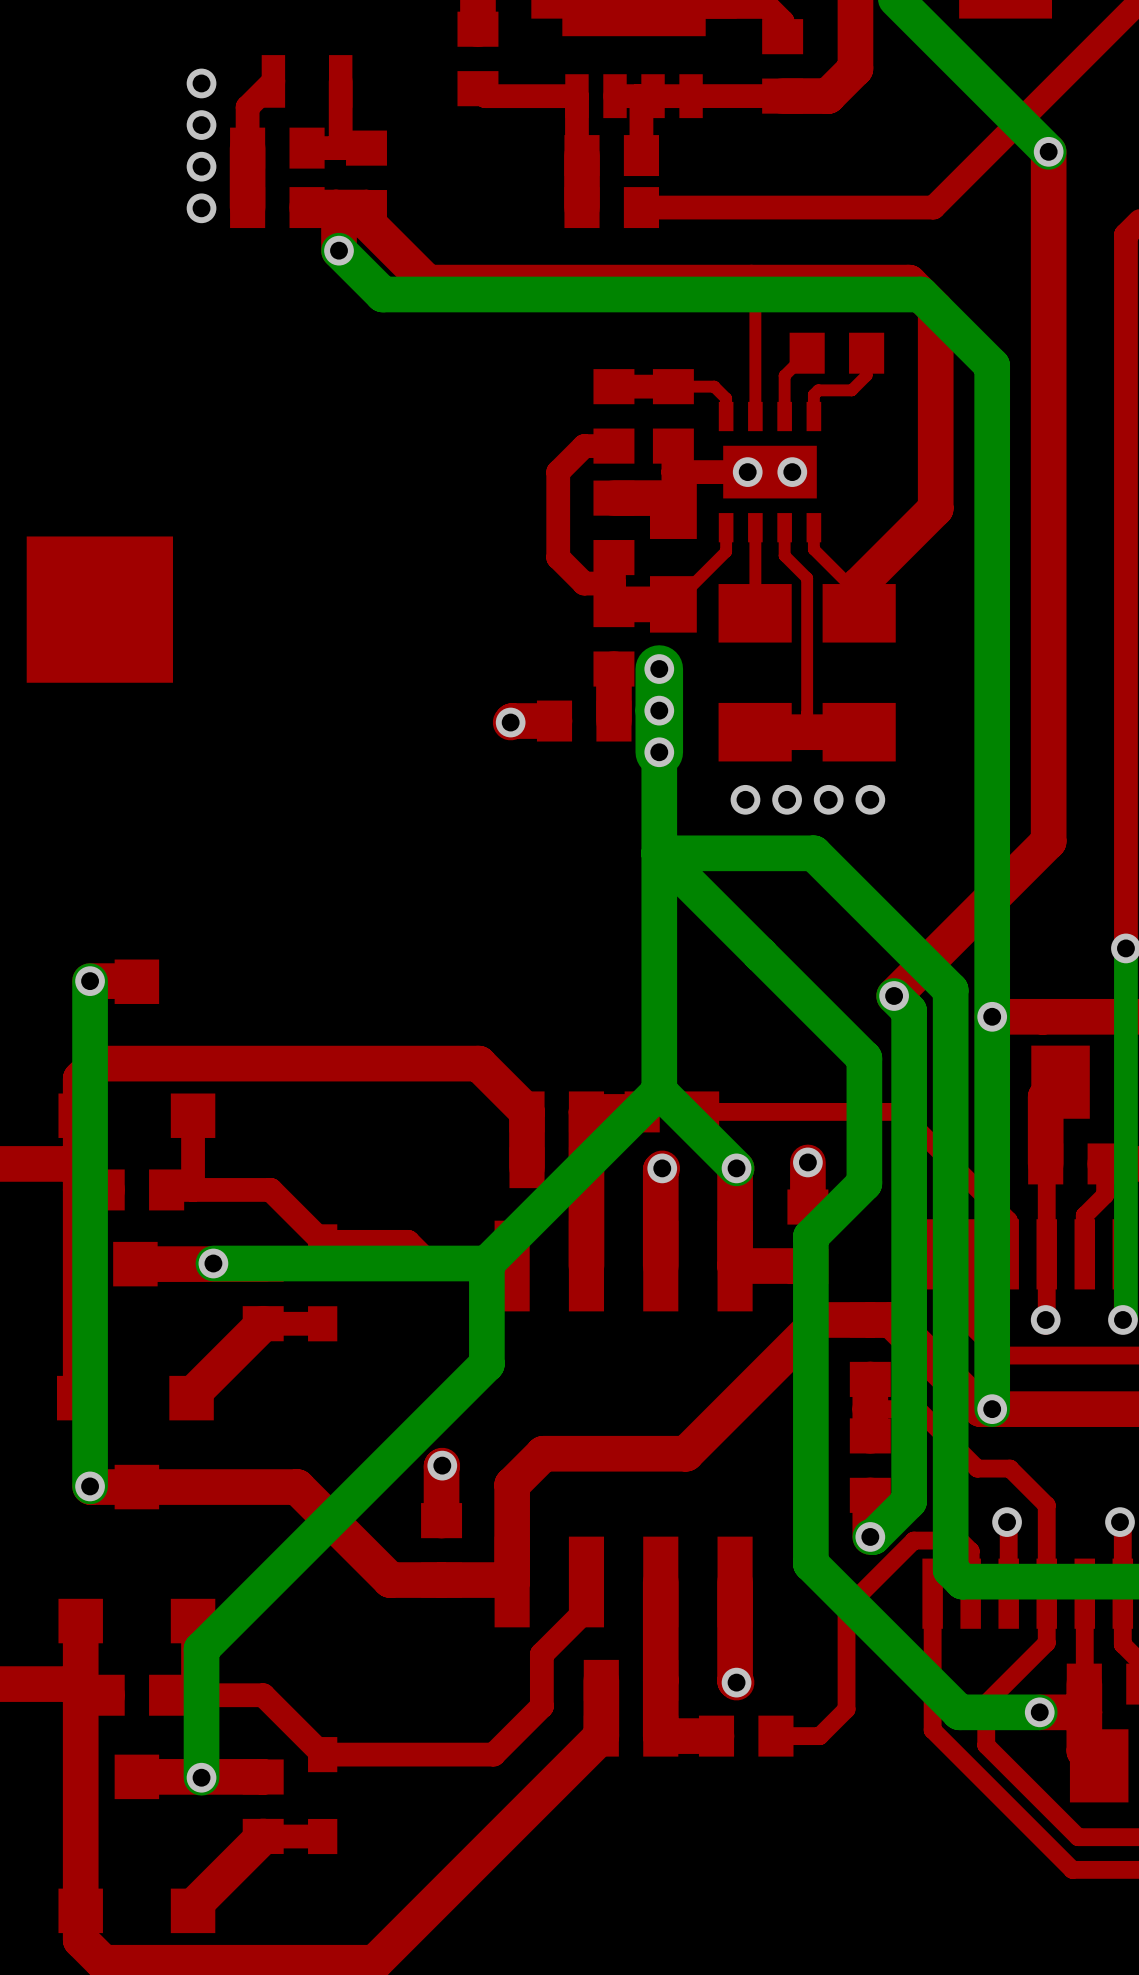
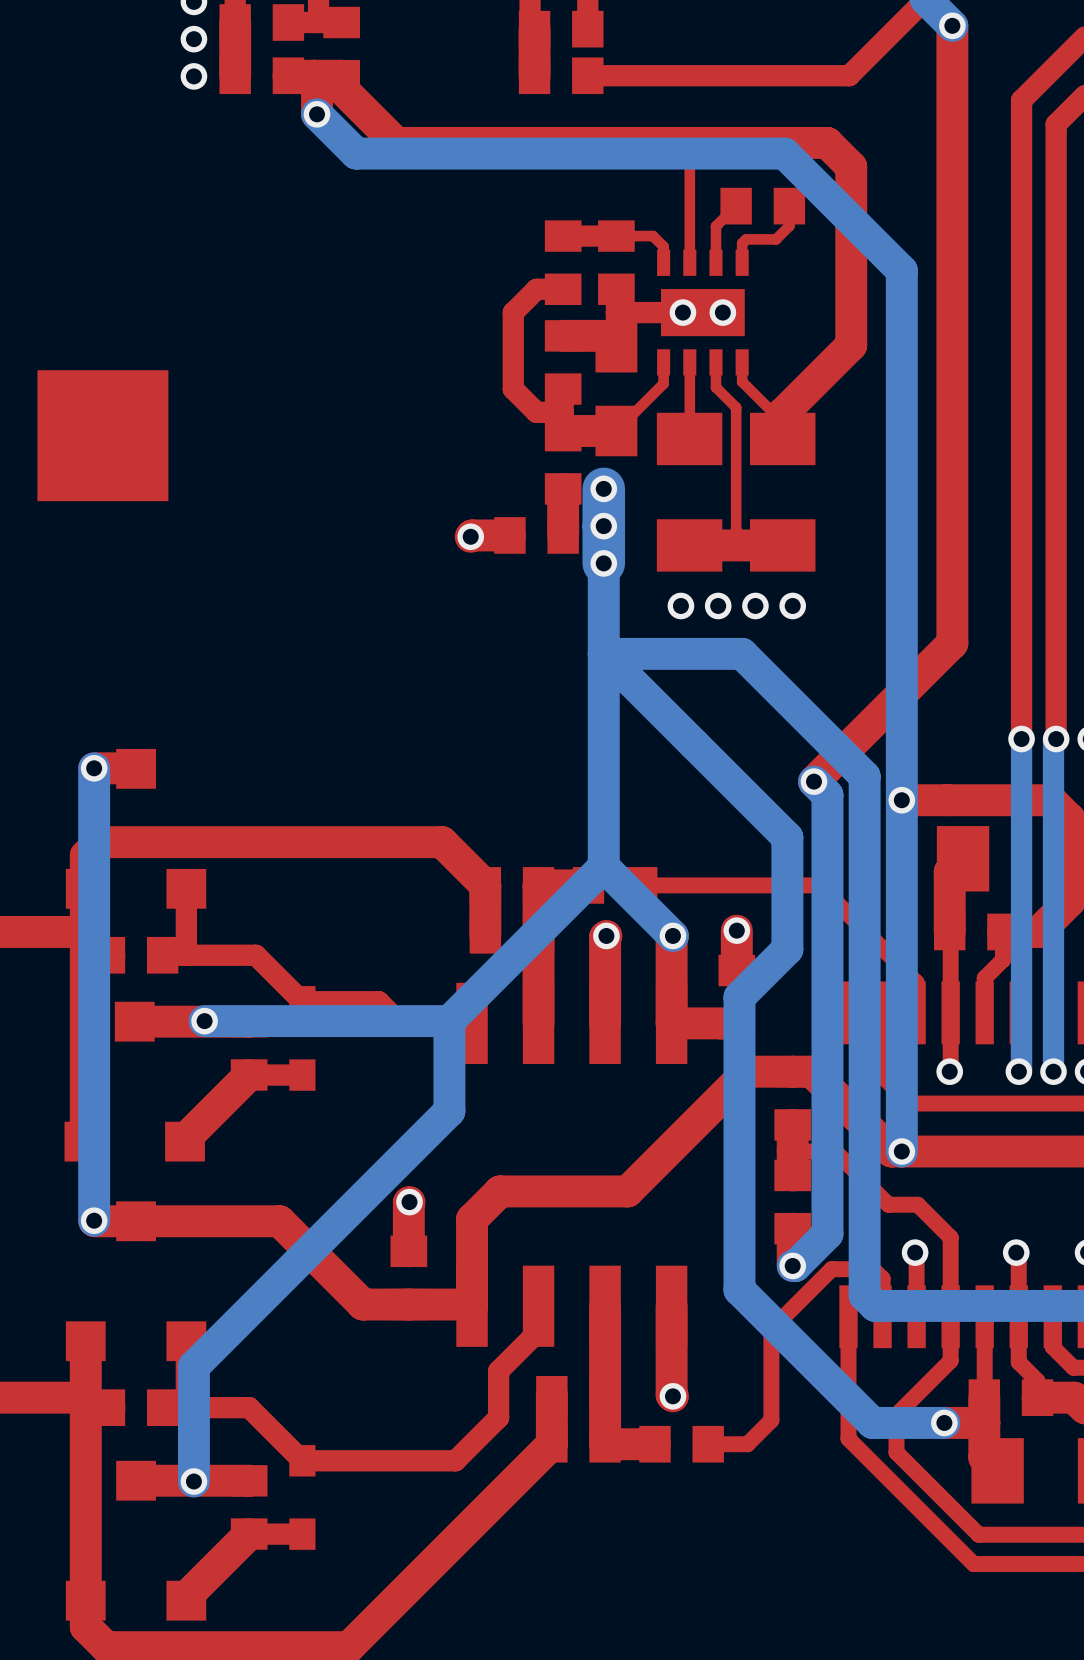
bottom track: (861, 294) (920, 294) (992, 365) (992, 425) -> (784, 153) (901, 270)

